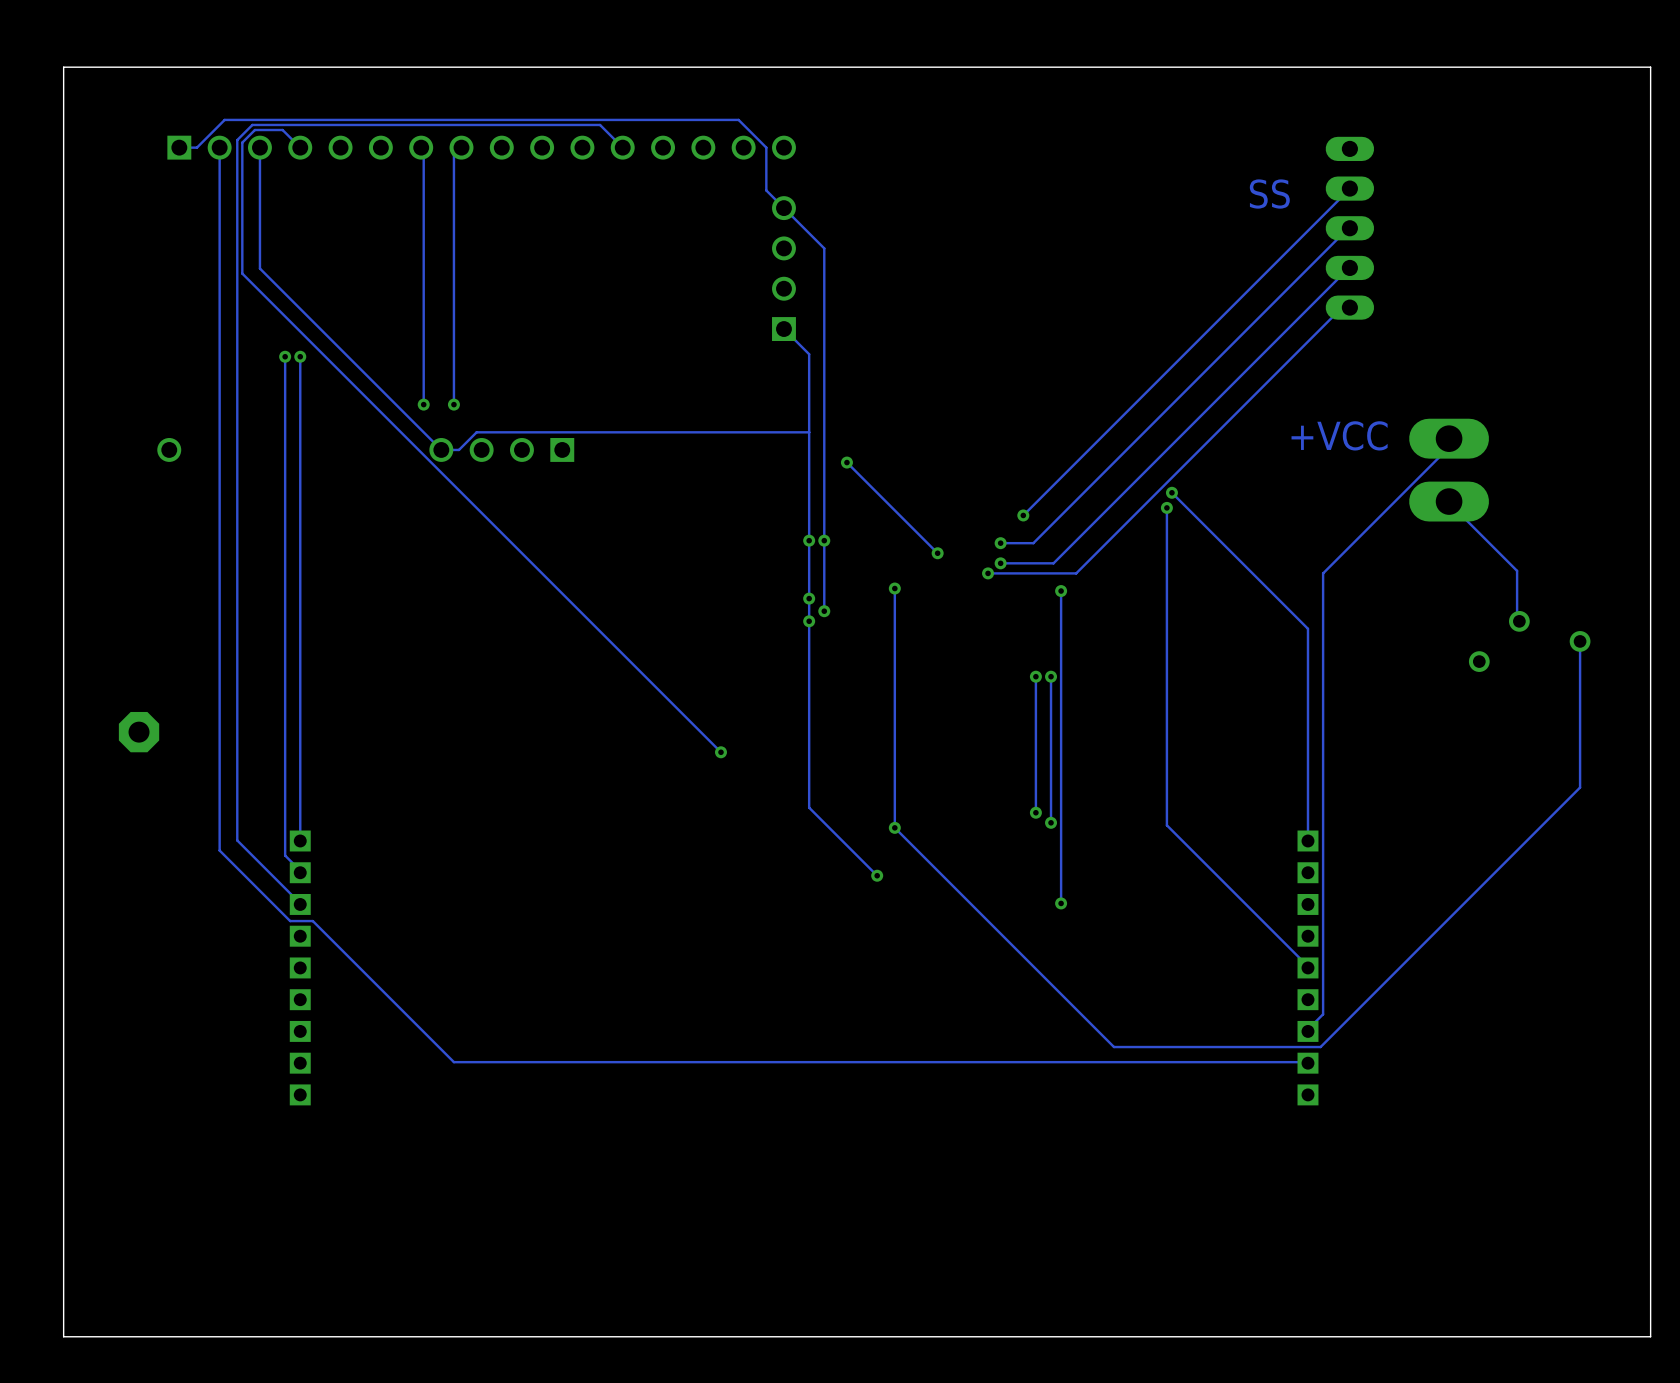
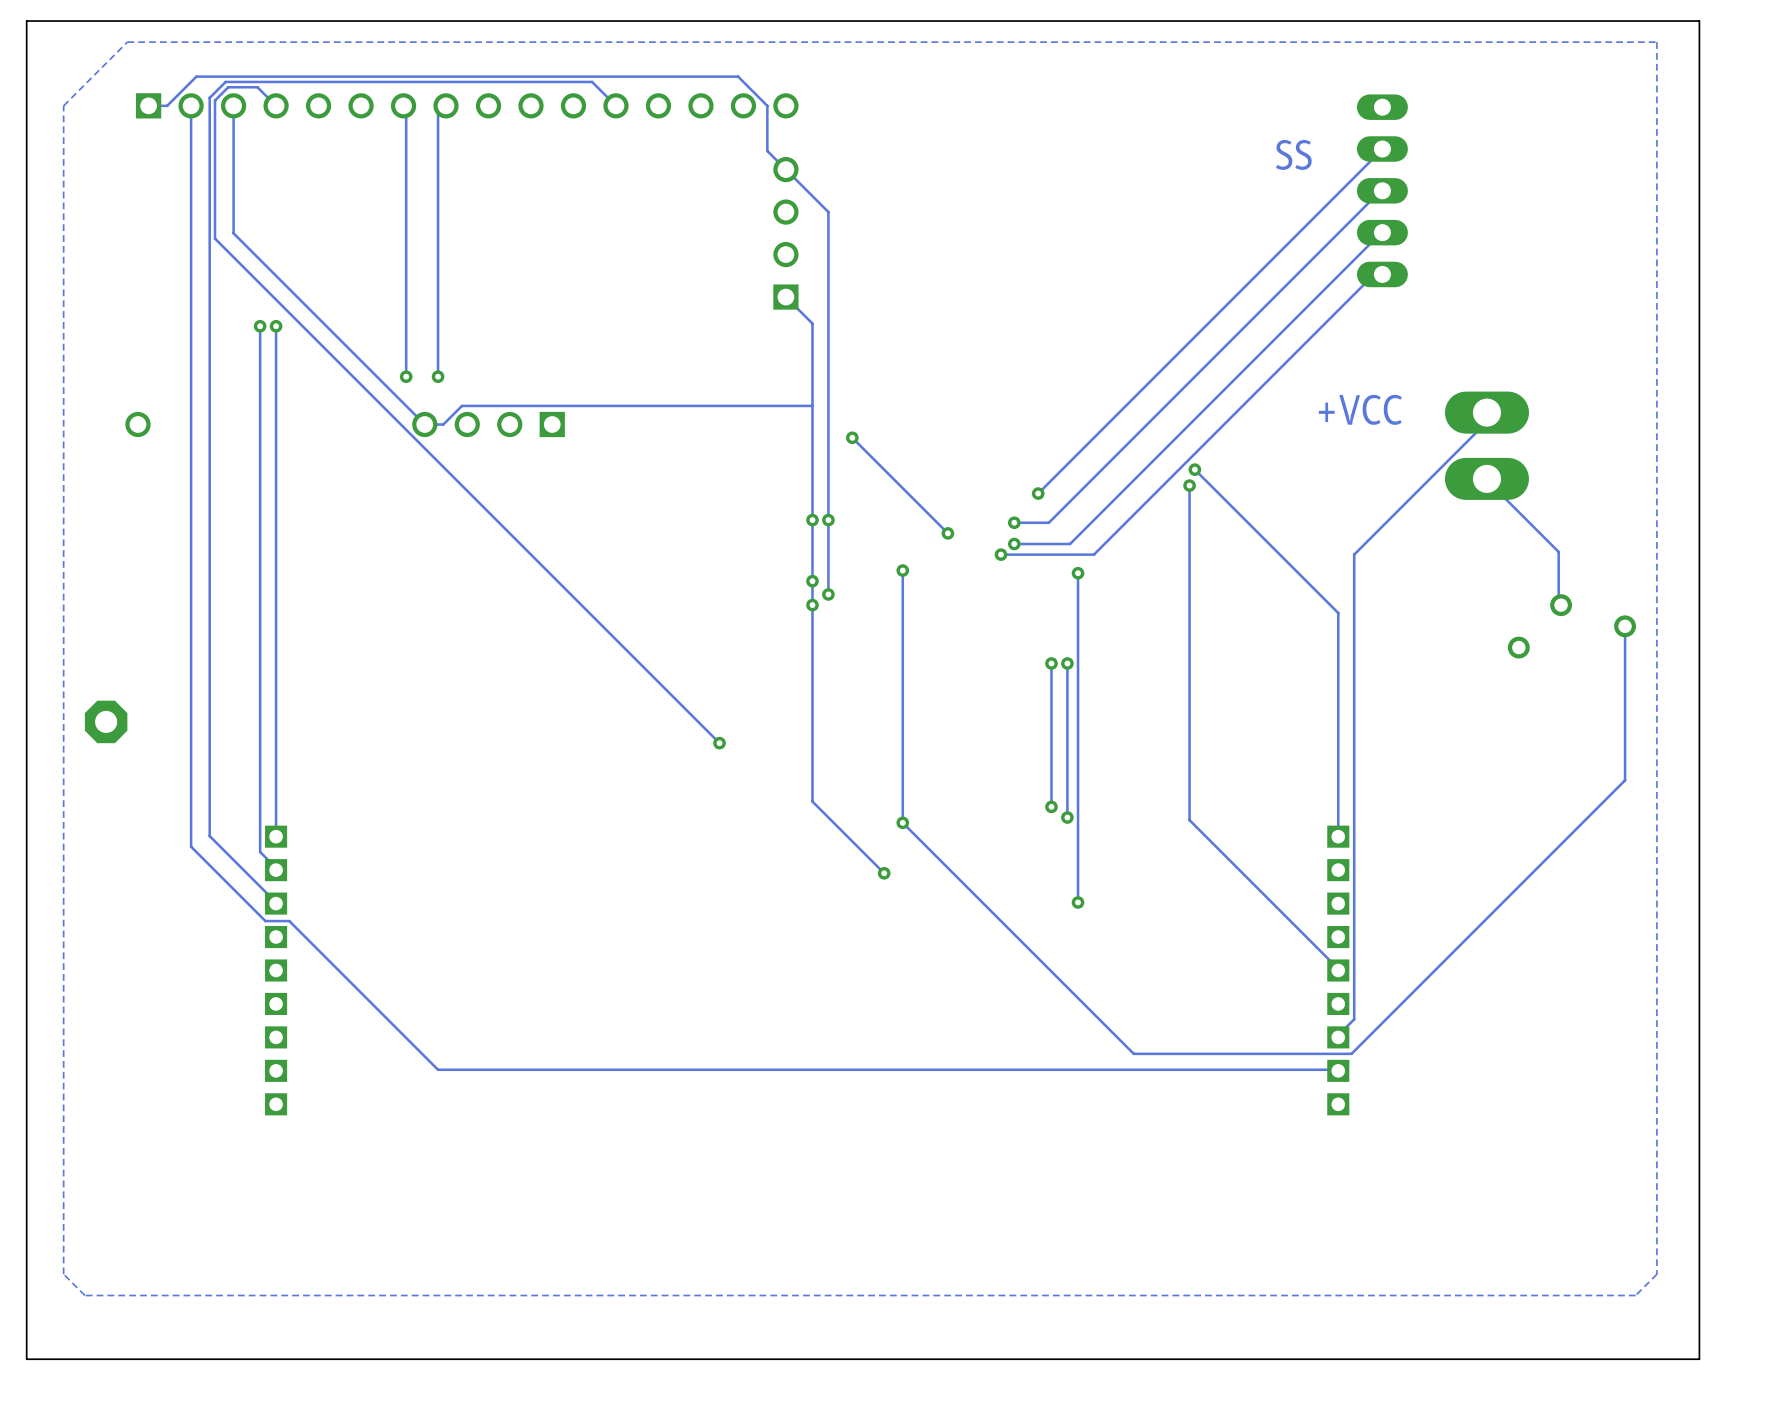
zone outline: none -> (1656, 42) (1656, 1274) (1635, 1295) (84, 1295) (63, 1274) (63, 105) (127, 42) (1656, 42)

